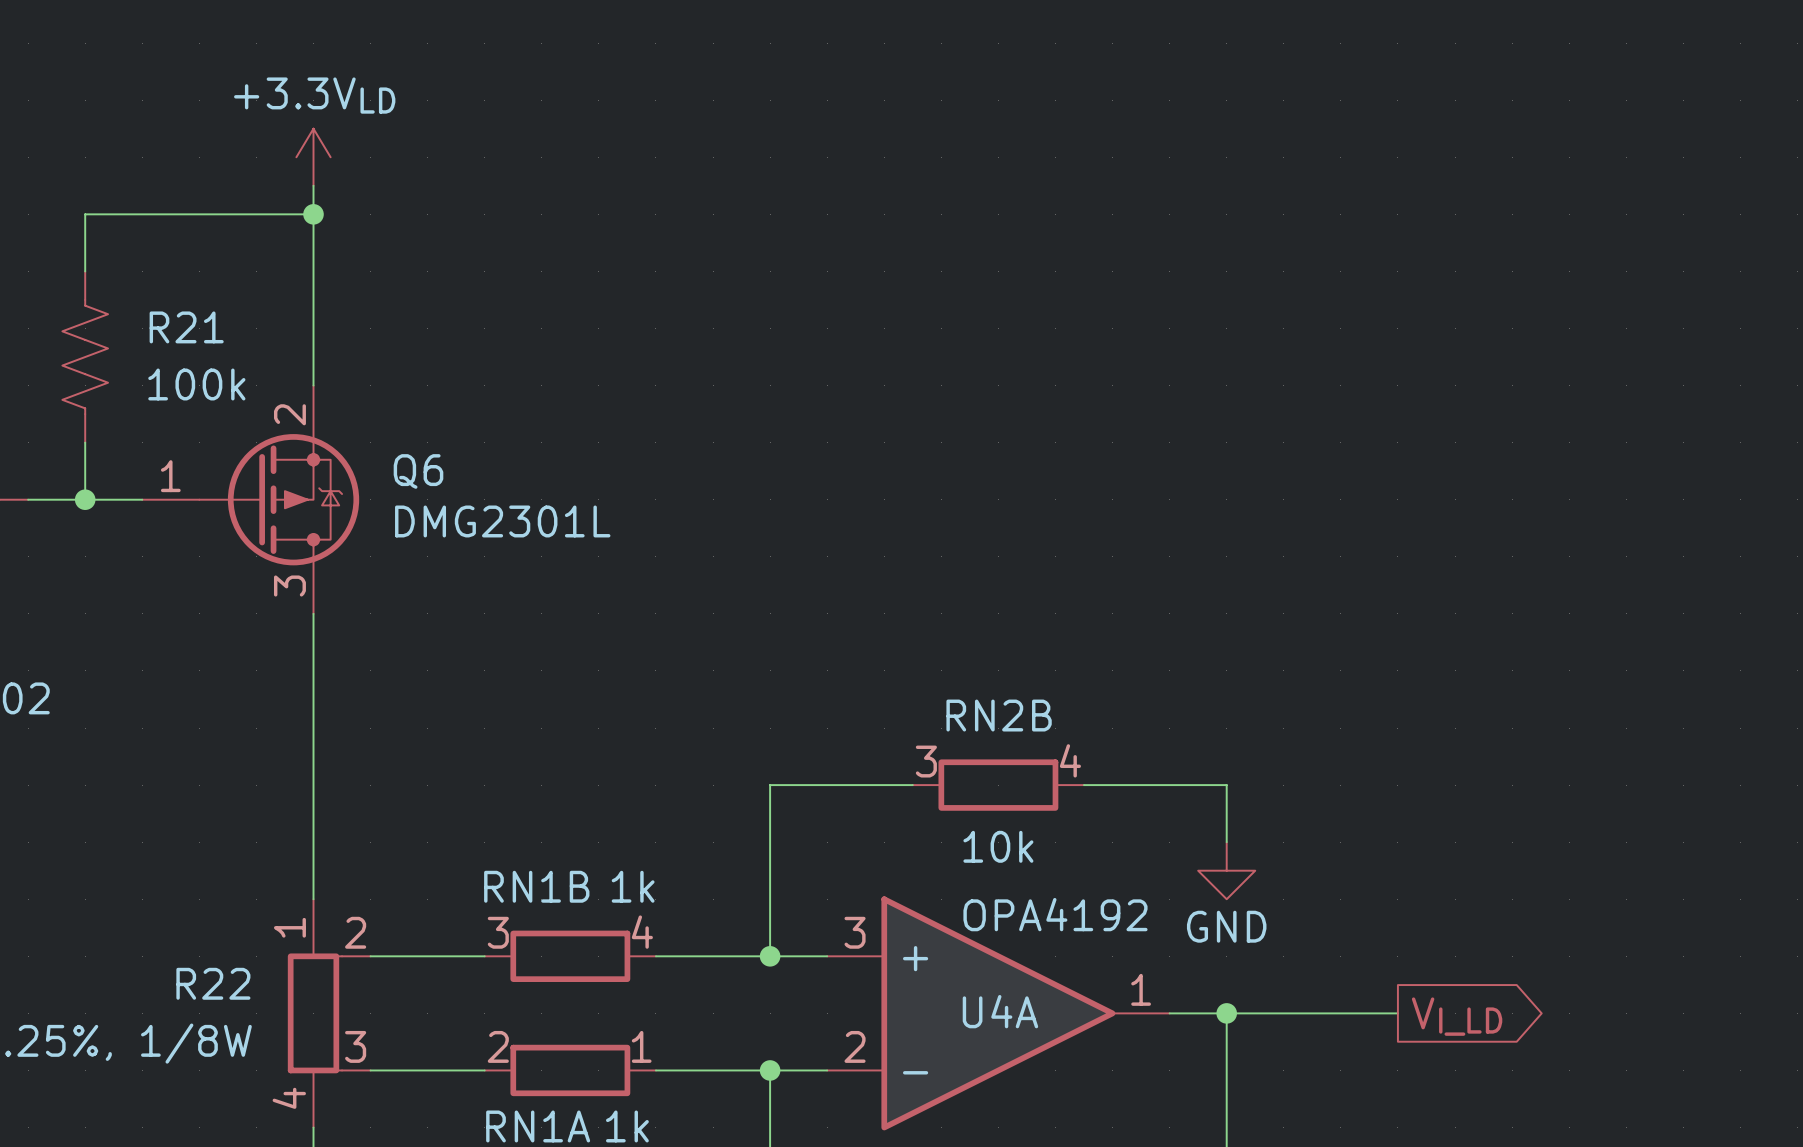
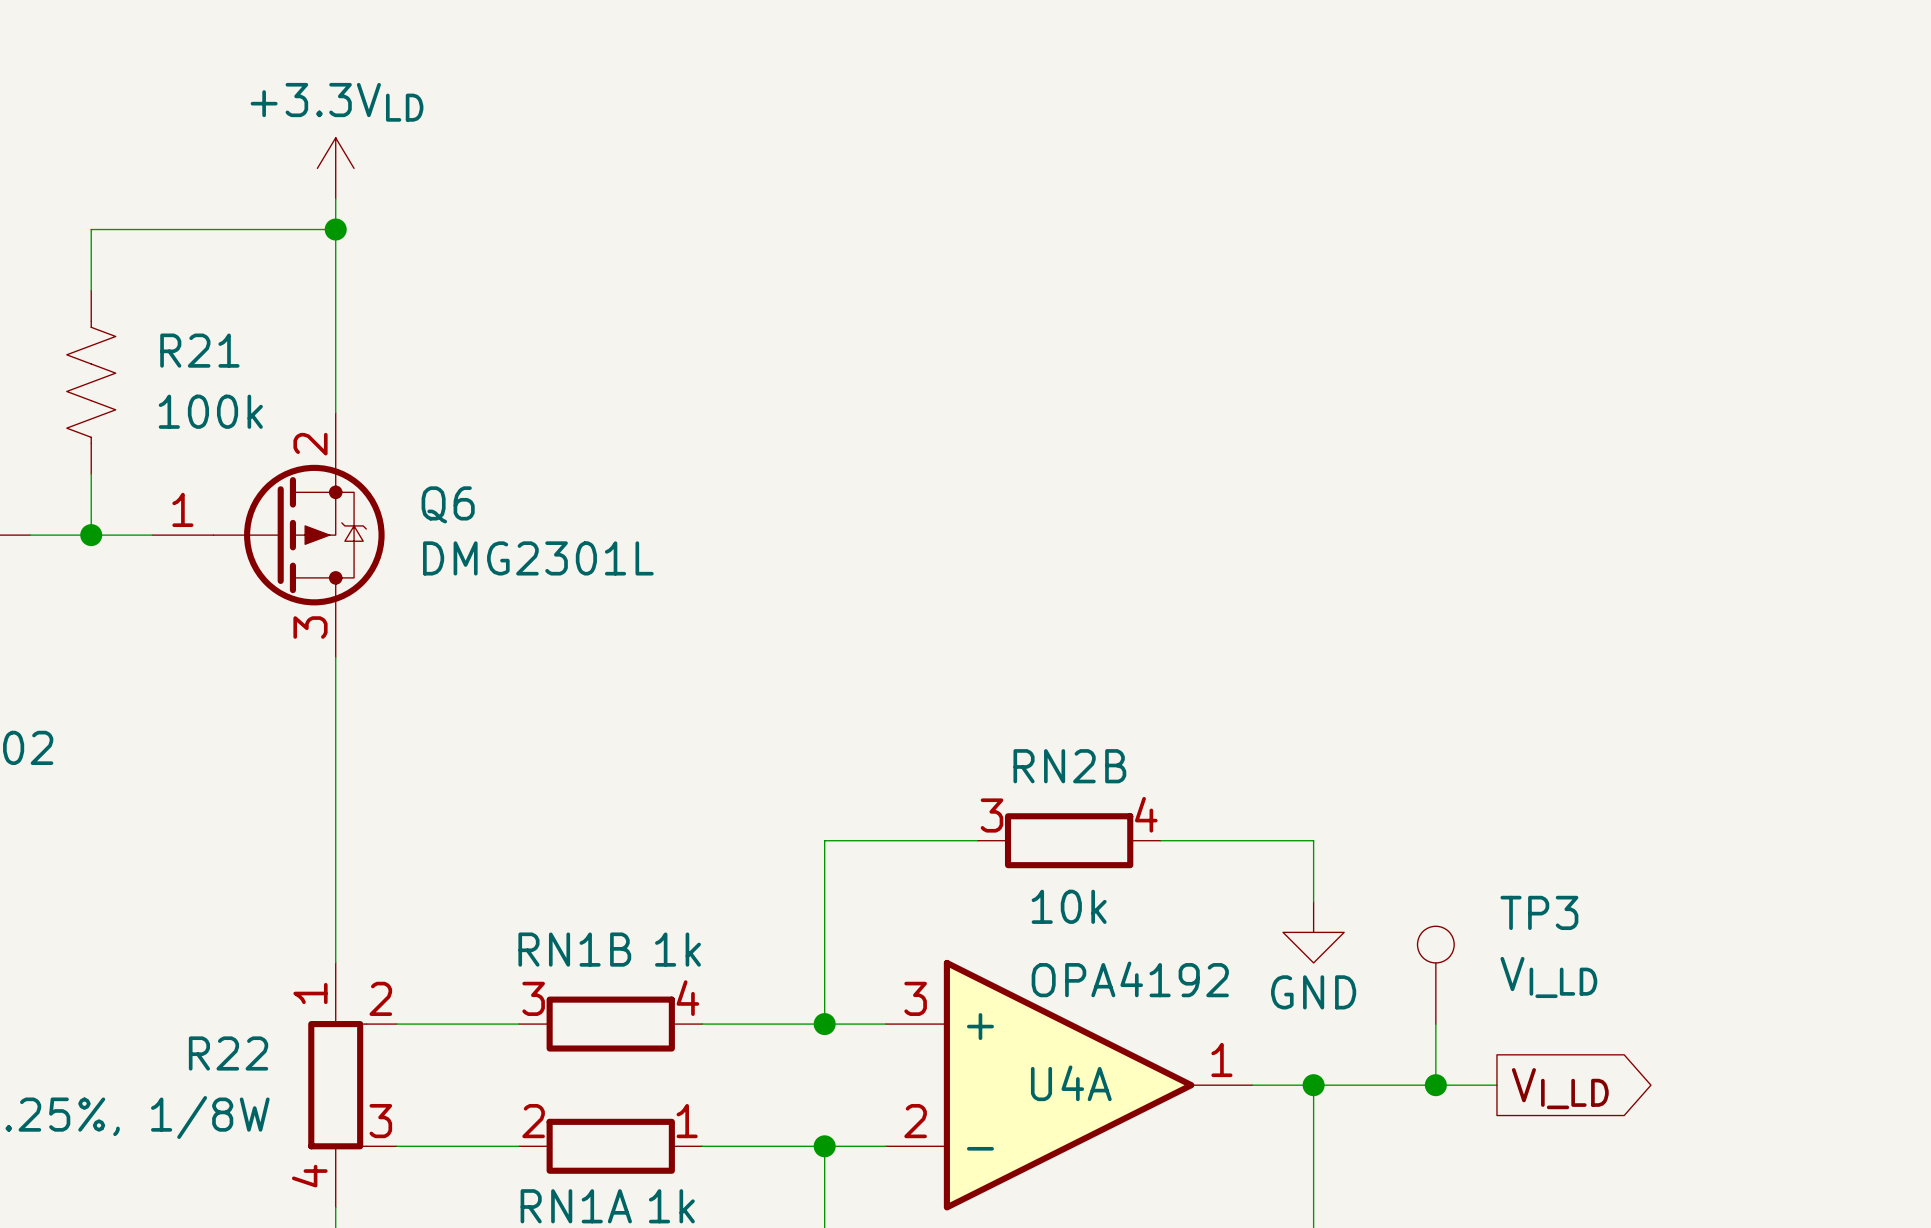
TP3: none -> VI_LD (1435, 975)
wire: none -> (1435, 1024) (1435, 1085)
junction: none -> (1435, 1085)

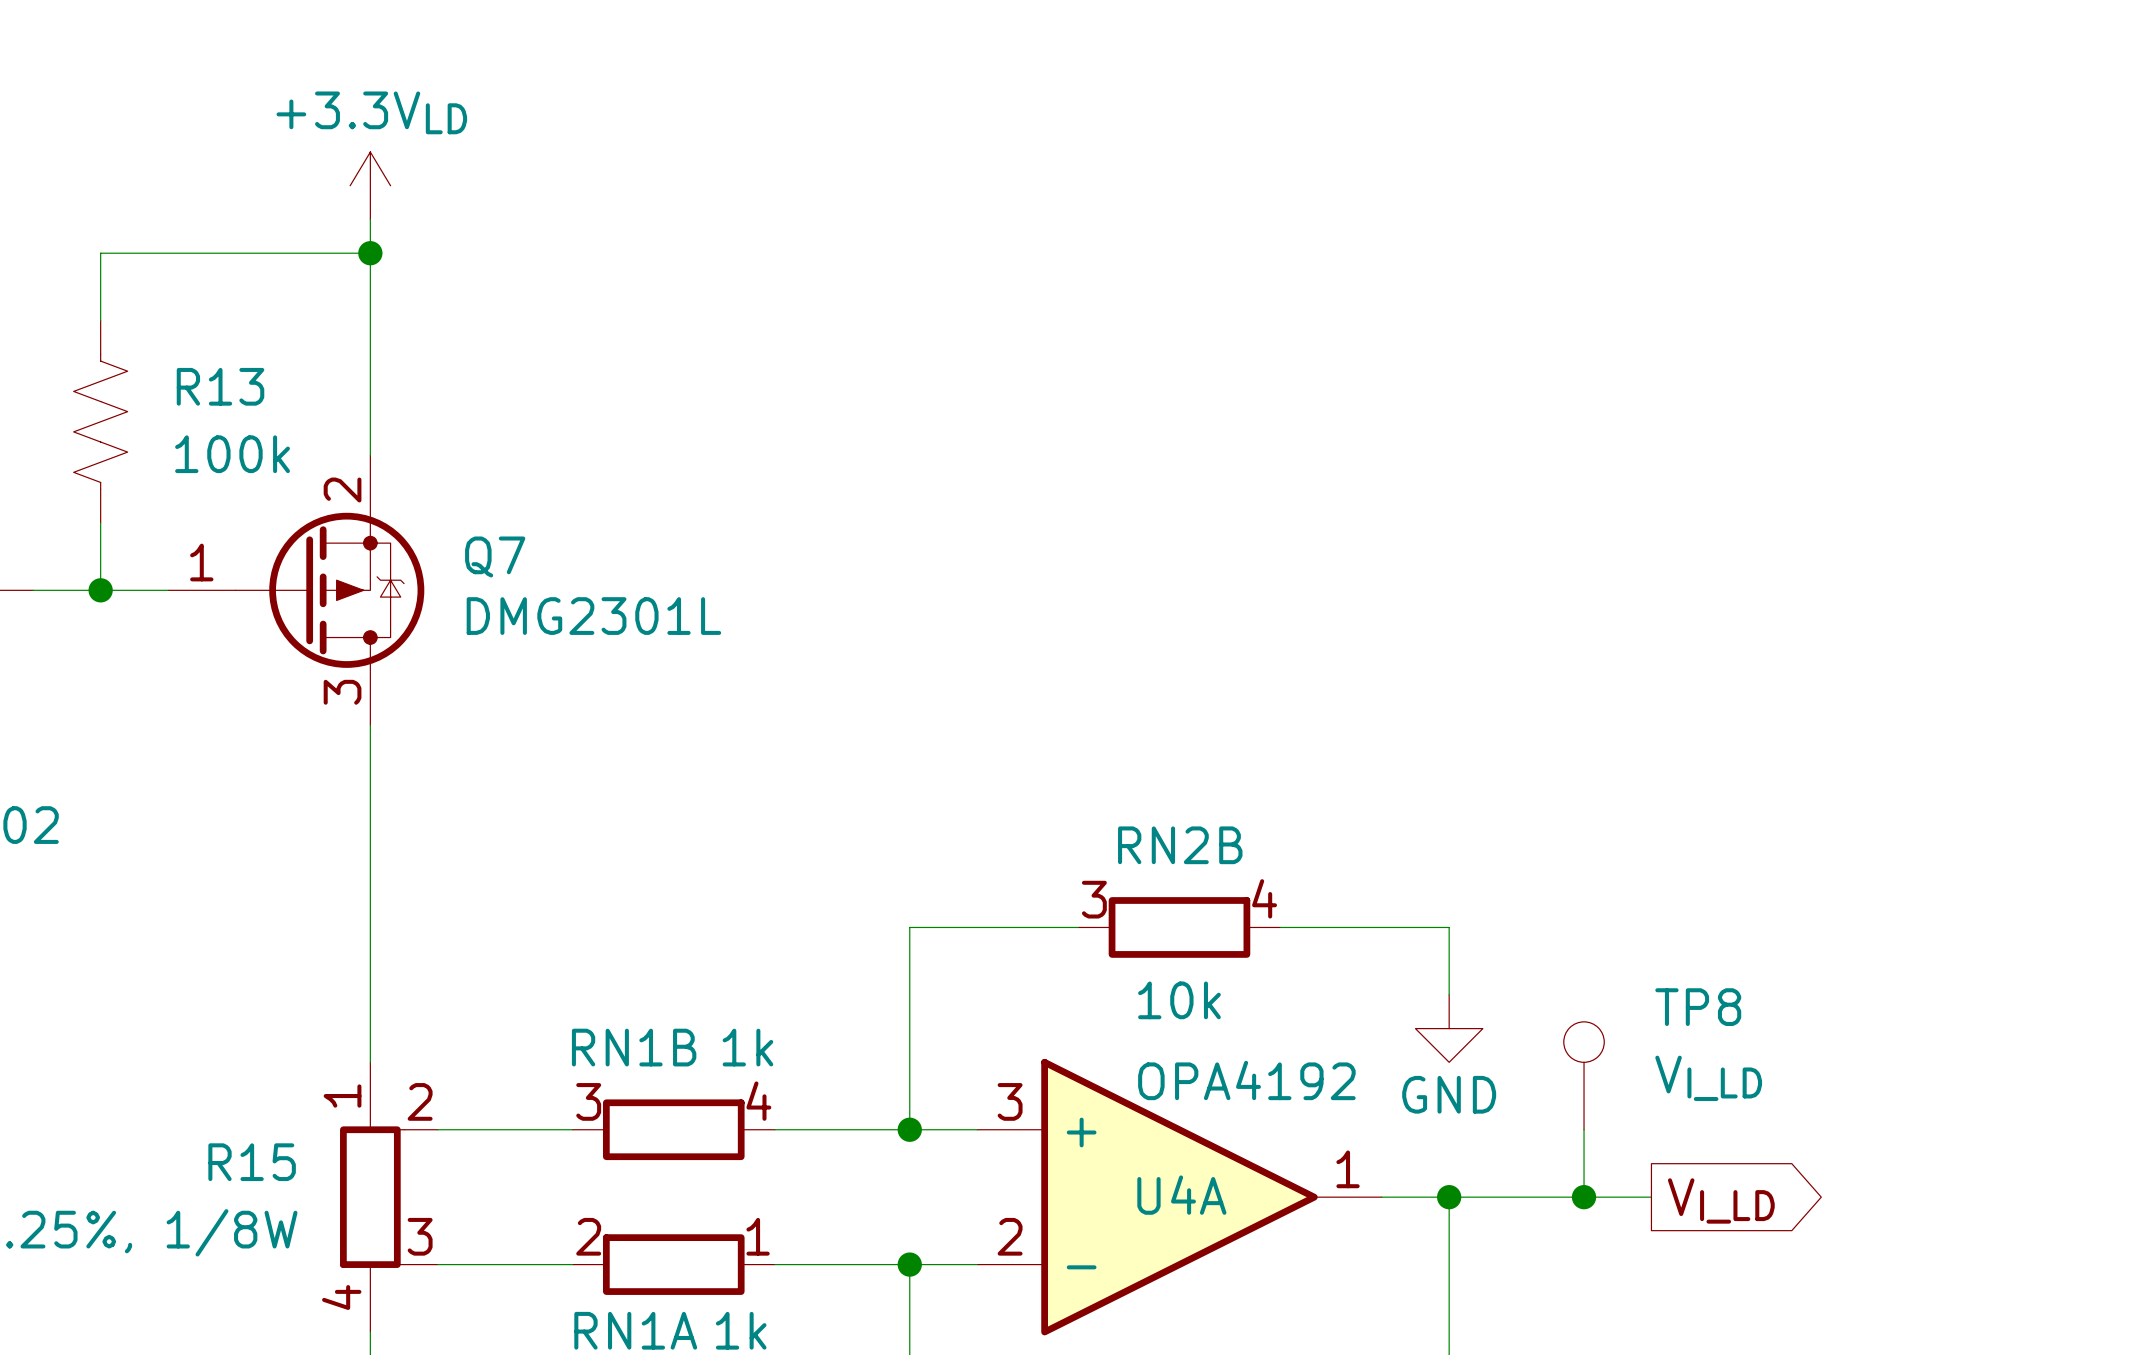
R21 name: R21 (199, 350) -> R13 (220, 386)
Q6 name: Q6 (448, 504) -> Q7 (495, 556)
TP3 name: TP3 (1539, 912) -> TP8 (1698, 1007)
R22 name: R22 (228, 1053) -> R15 (252, 1162)

